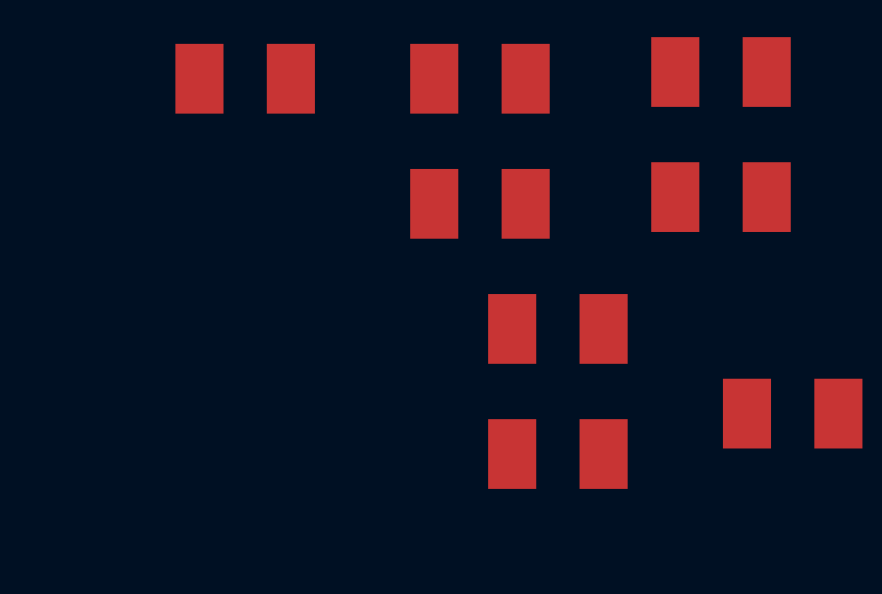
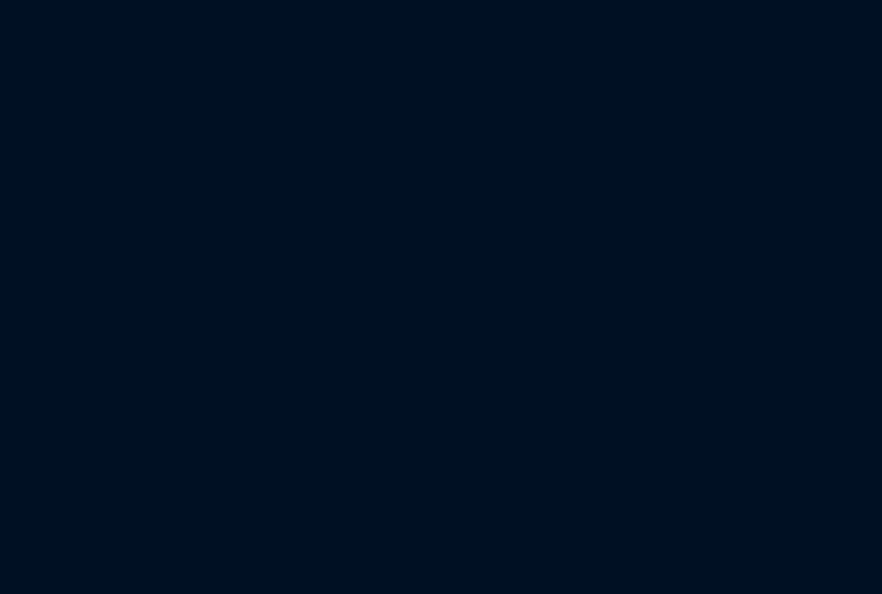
part: (720, 72) -> none
part: (245, 78) -> none
part: (479, 78) -> none
part: (720, 197) -> none
part: (479, 203) -> none
part: (557, 328) -> none
part: (792, 413) -> none
part: (557, 454) -> none

